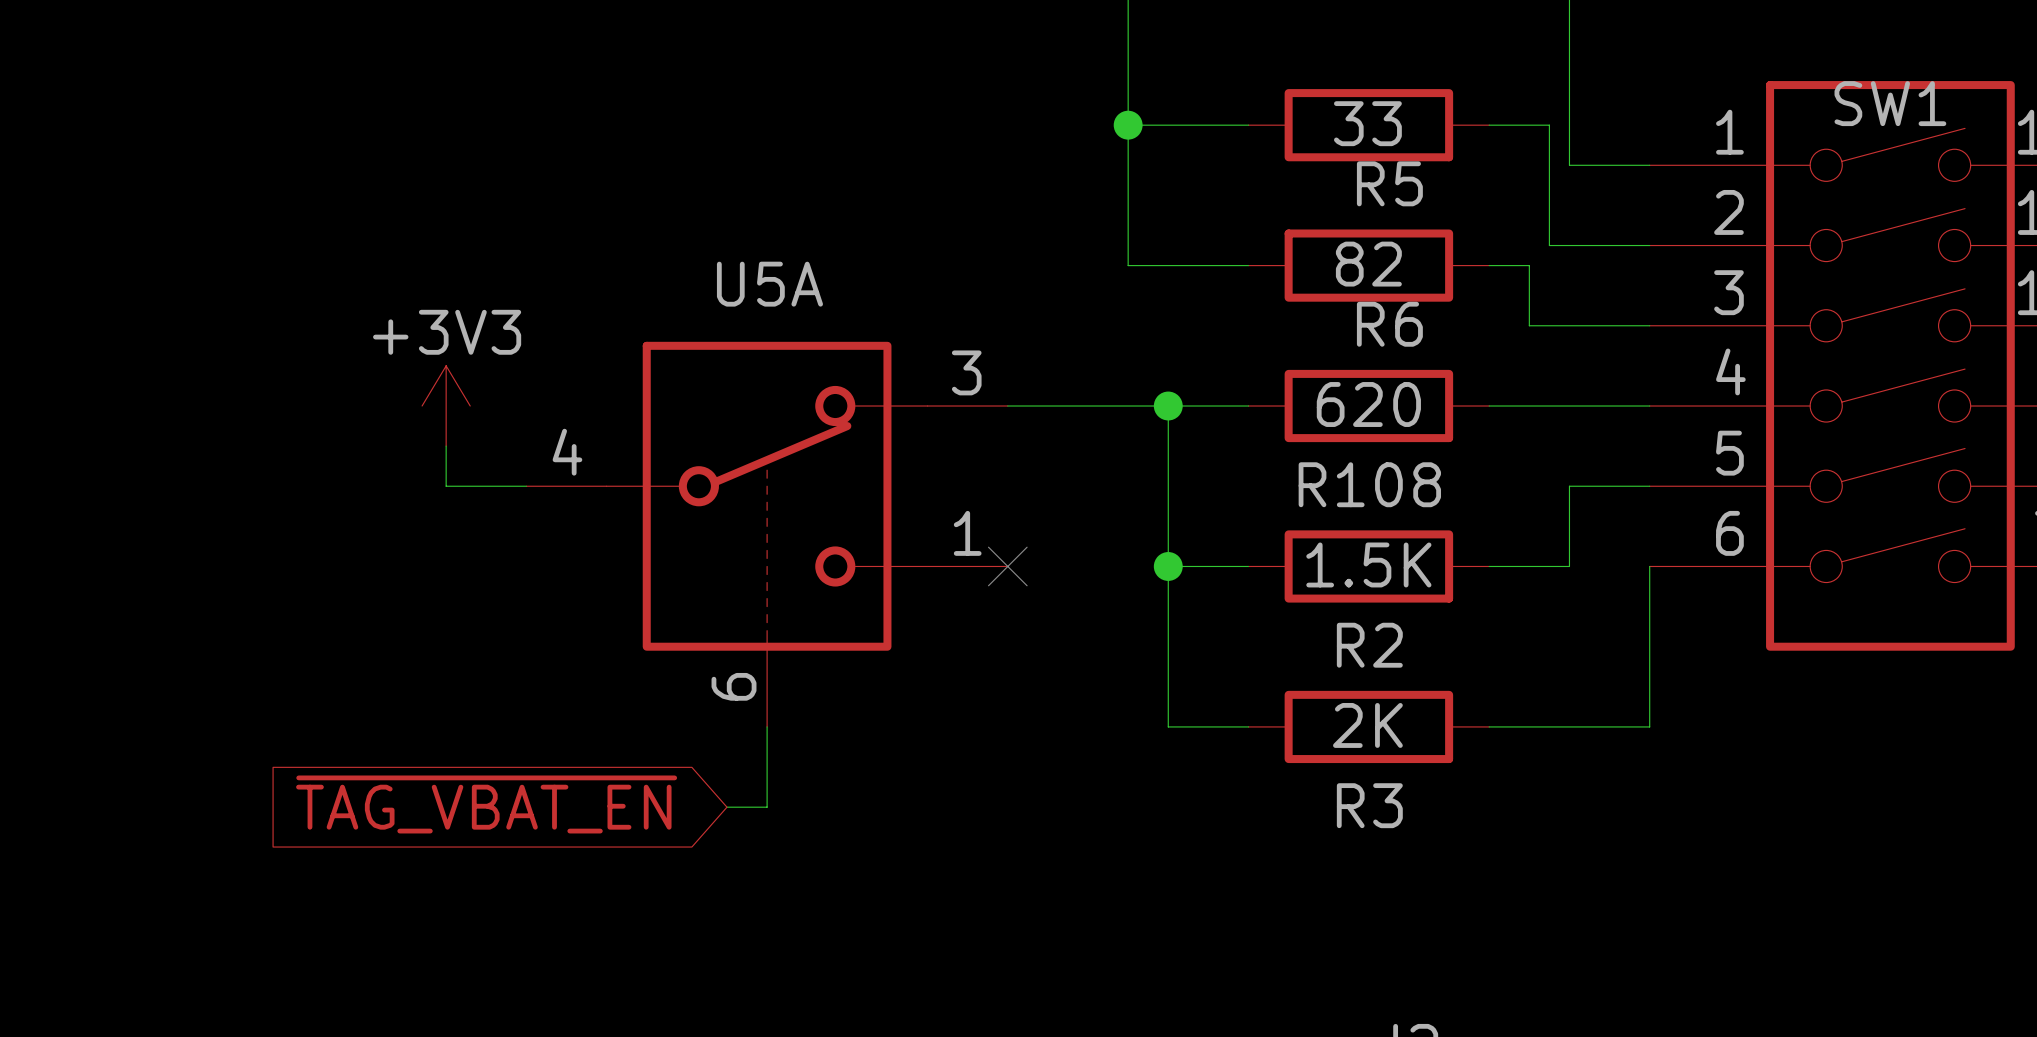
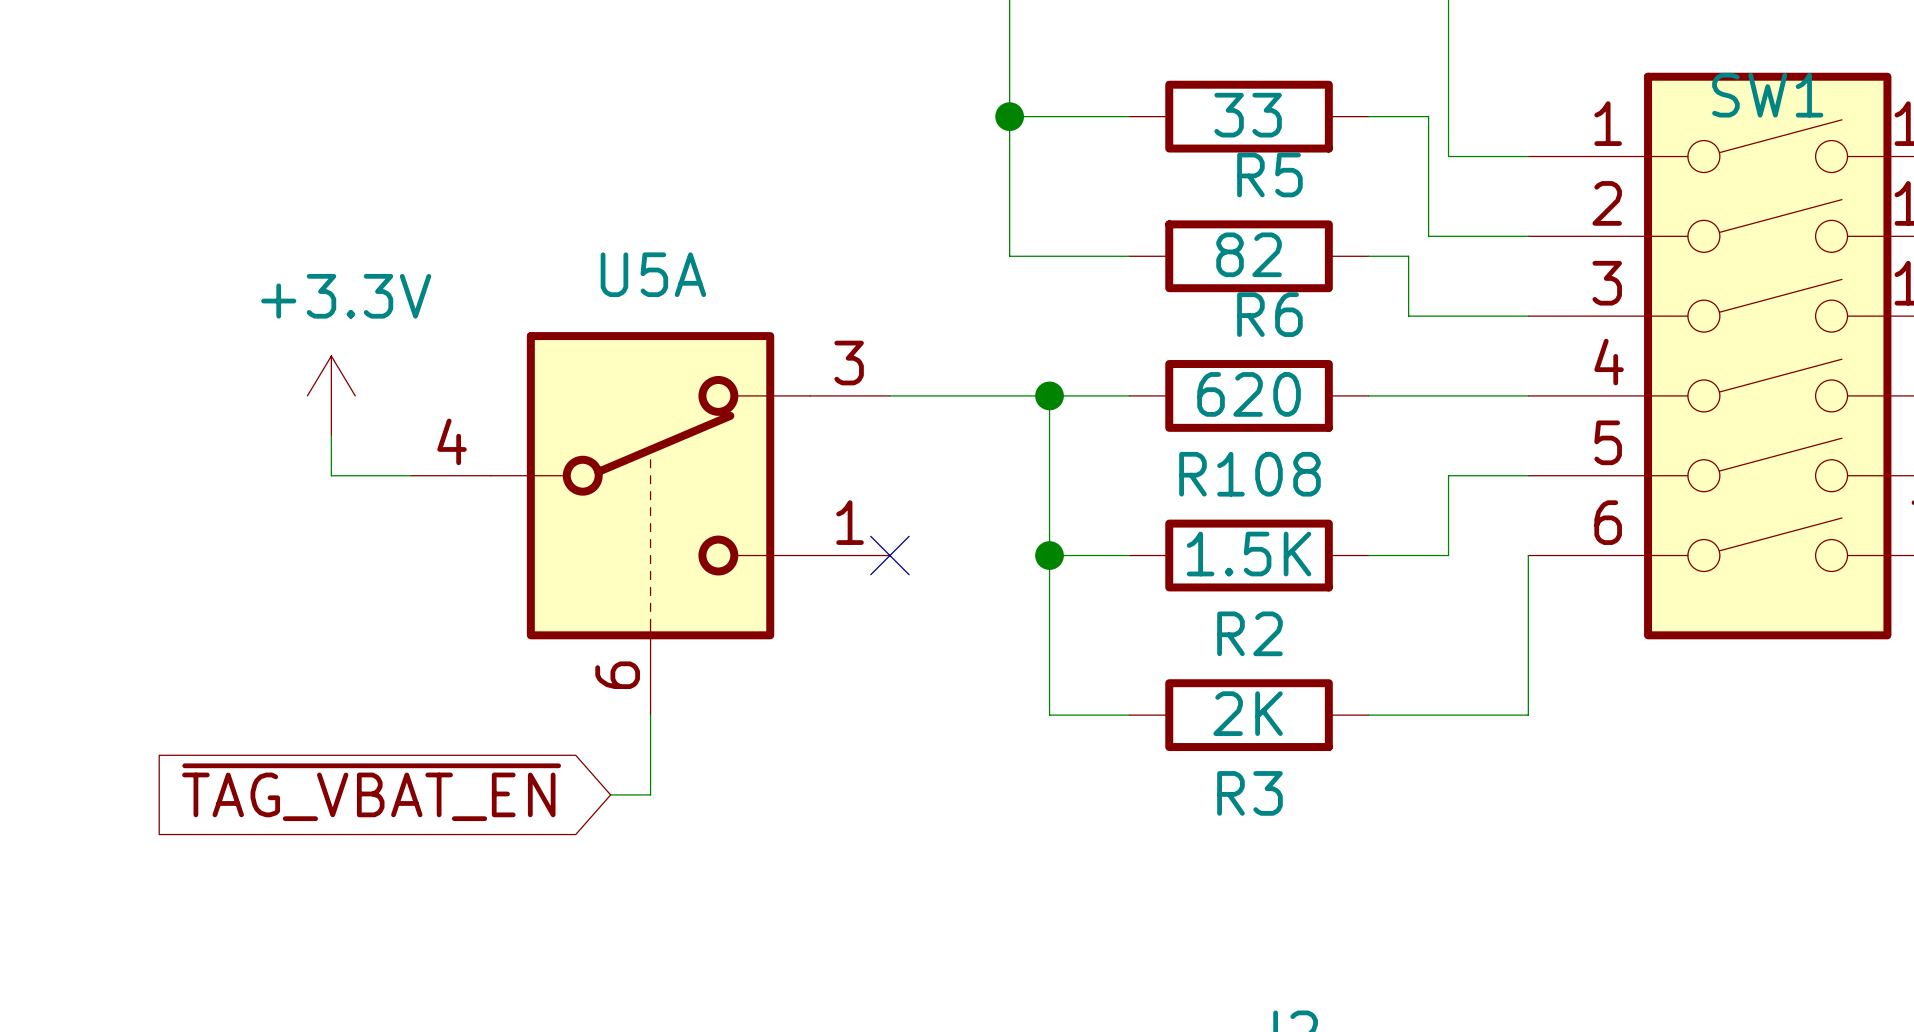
power symbol: +3V3 (446, 406) -> +3.3V (331, 395)

